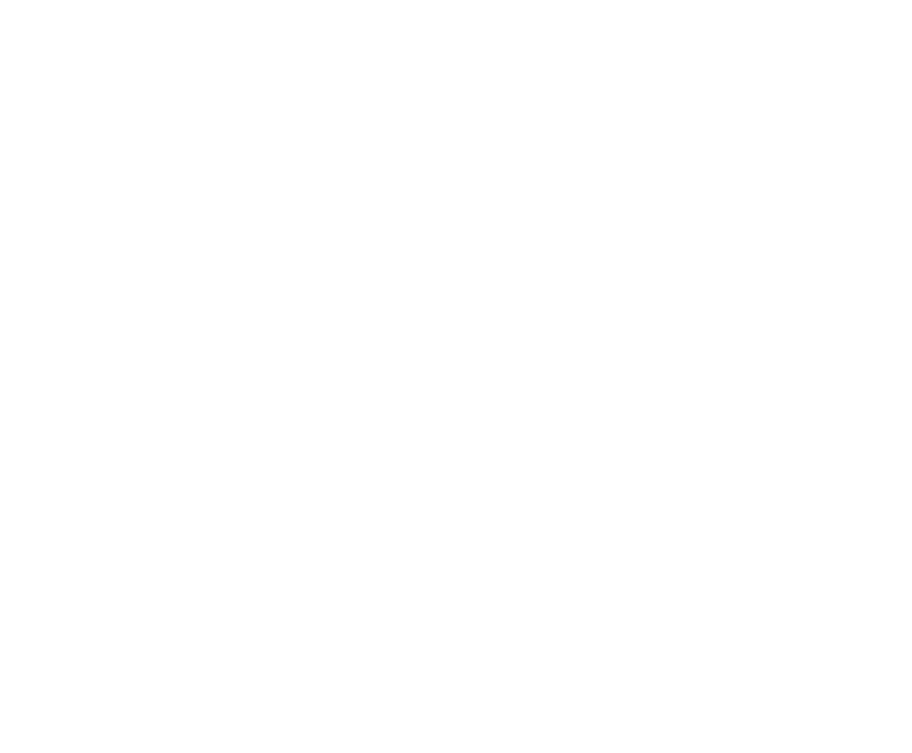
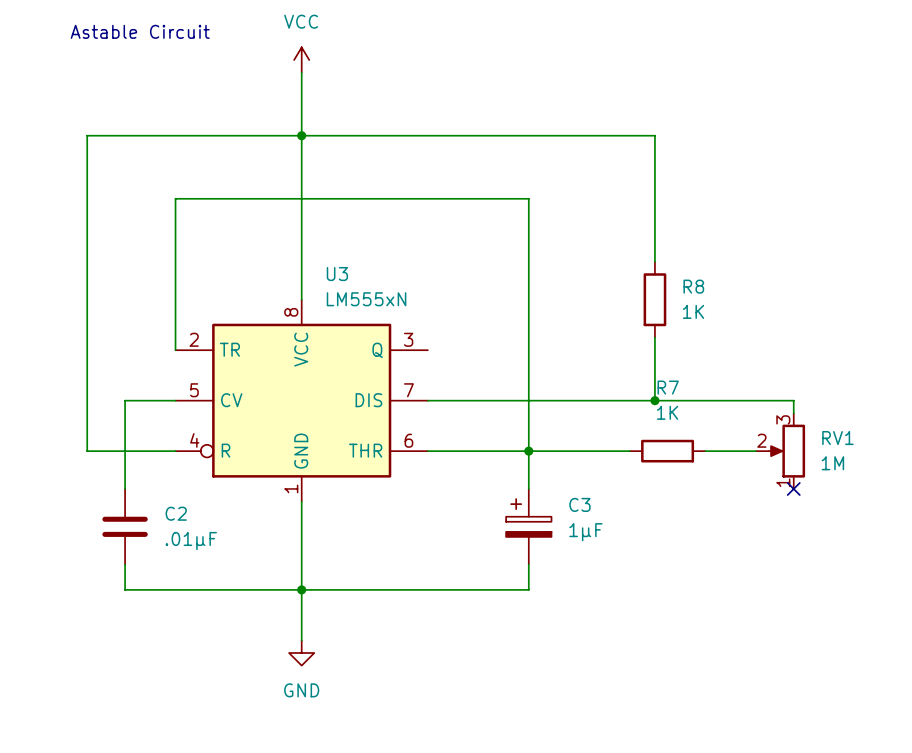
text: none -> Astable Circuit (140, 31)
power symbol: none -> VCC (301, 60)
wire: none -> (301, 72) (301, 299)
junction: none -> (301, 135)
wire: none -> (654, 261) (654, 135) (87, 135) (87, 451) (175, 451)
R8: none -> 1K (654, 299)
wire: none -> (654, 337) (654, 400)
wire: none -> (175, 350) (175, 198) (528, 198) (528, 488)
wire: none -> (175, 400) (125, 400) (125, 488)
U3: none -> LM555xN (301, 400)
wire: none -> (427, 400) (793, 400) (793, 413)
junction: none -> (654, 400)
wire: none -> (427, 451) (629, 451)
junction: none -> (528, 451)
R7: none -> 1K (667, 451)
wire: none -> (705, 451) (755, 451)
RV1: none -> 1M (780, 451)
no-connect mark: none -> (793, 488)
wire: none -> (301, 501) (301, 640)
C2: none -> .01µF (125, 526)
C3: none -> 1µF (528, 526)
wire: none -> (125, 564) (125, 589) (528, 589) (528, 564)
junction: none -> (301, 589)
power symbol: none -> GND (301, 652)

